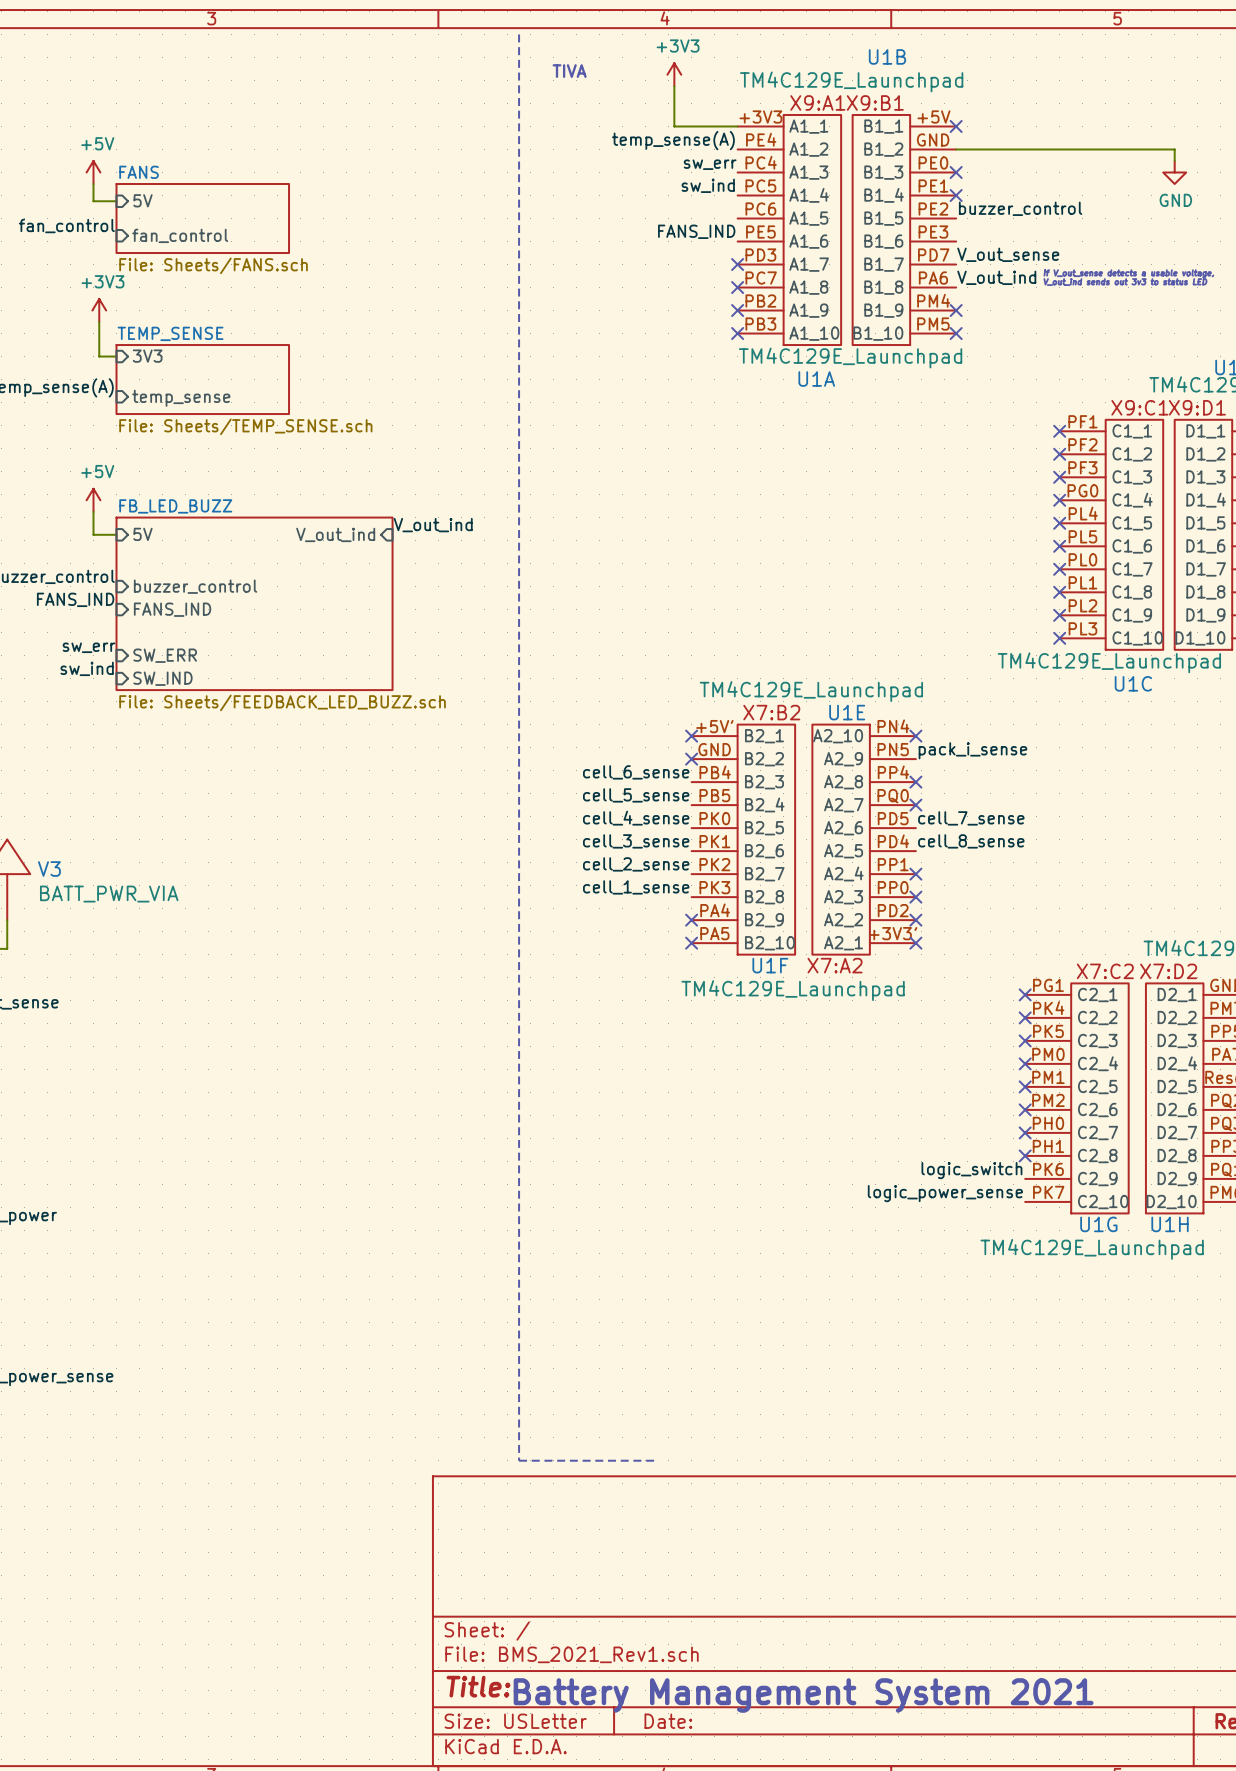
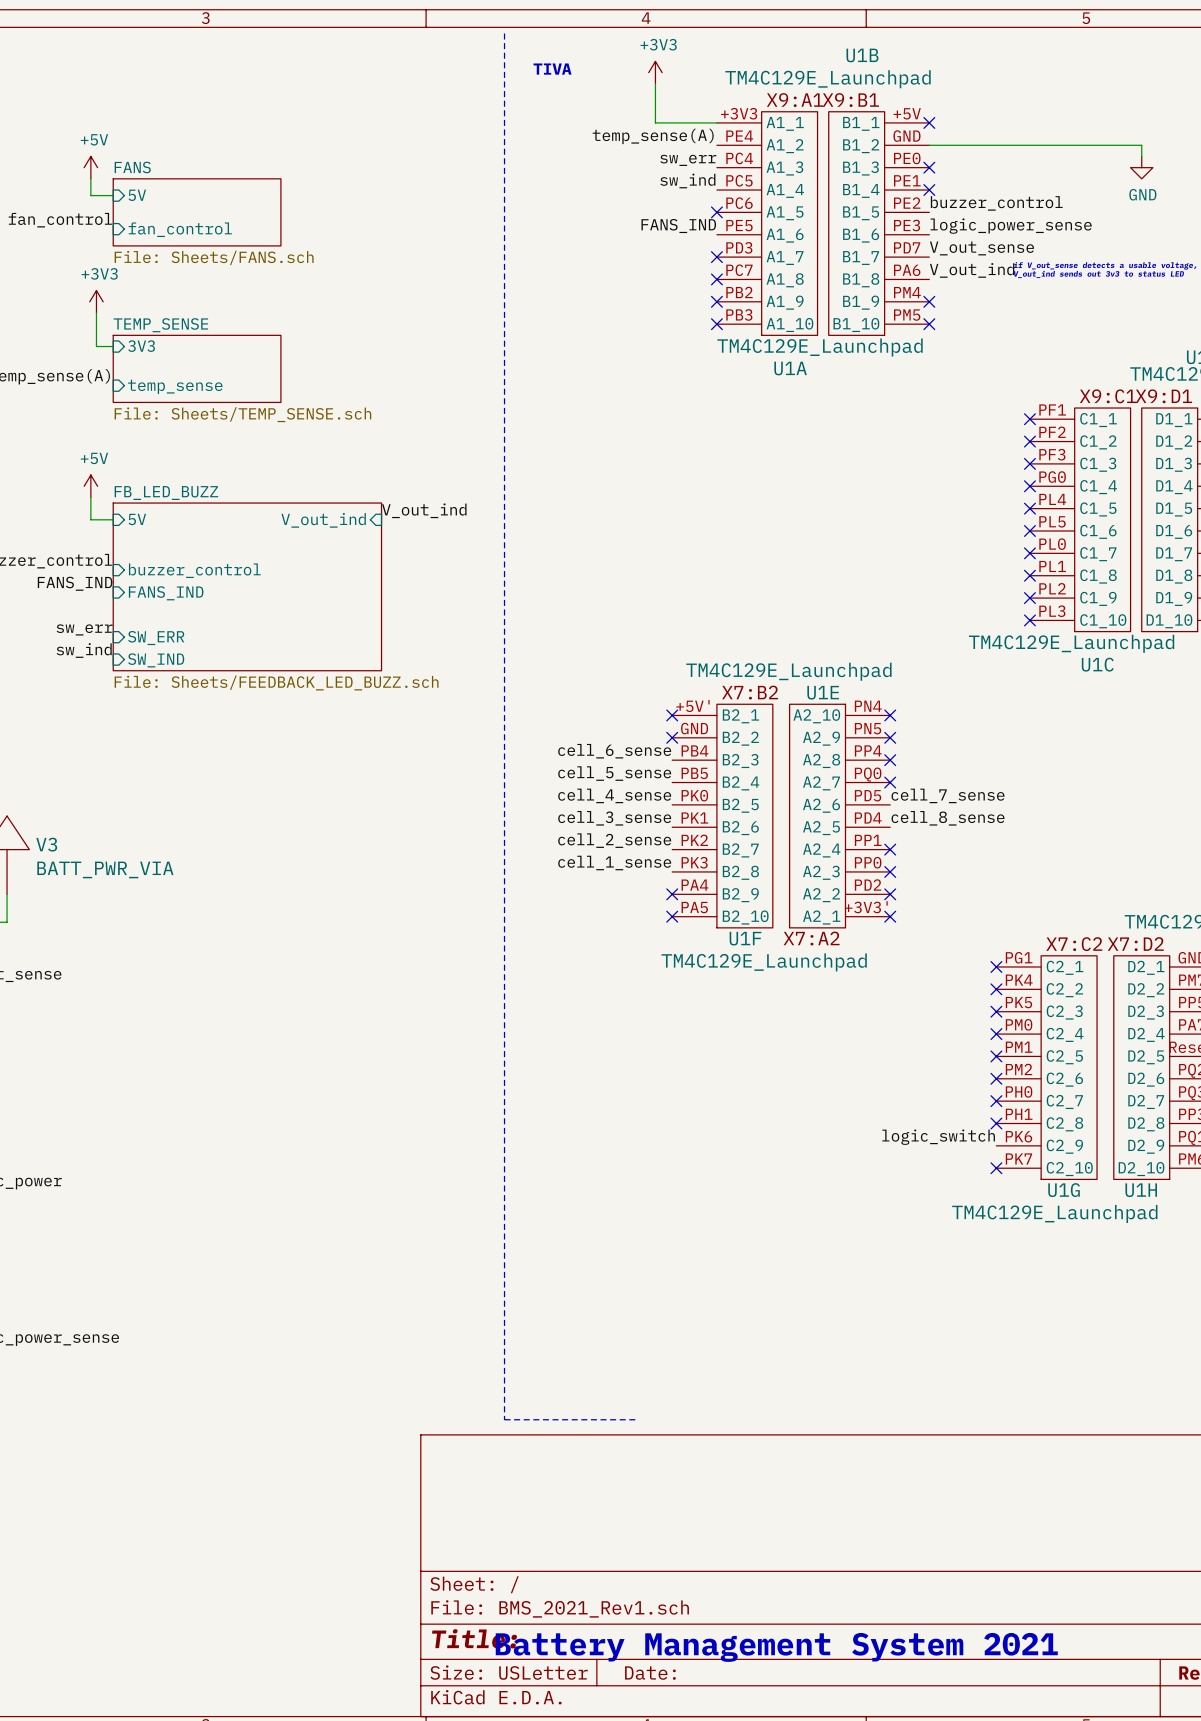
no-connect mark: none -> (716, 212)
label: none -> logic_power_sense (1011, 226)
label: pack_i_sense (972, 750) -> none
no-connect mark: none -> (890, 737)
label: logic_power_sense (945, 1193) -> none
no-connect mark: none -> (996, 1168)

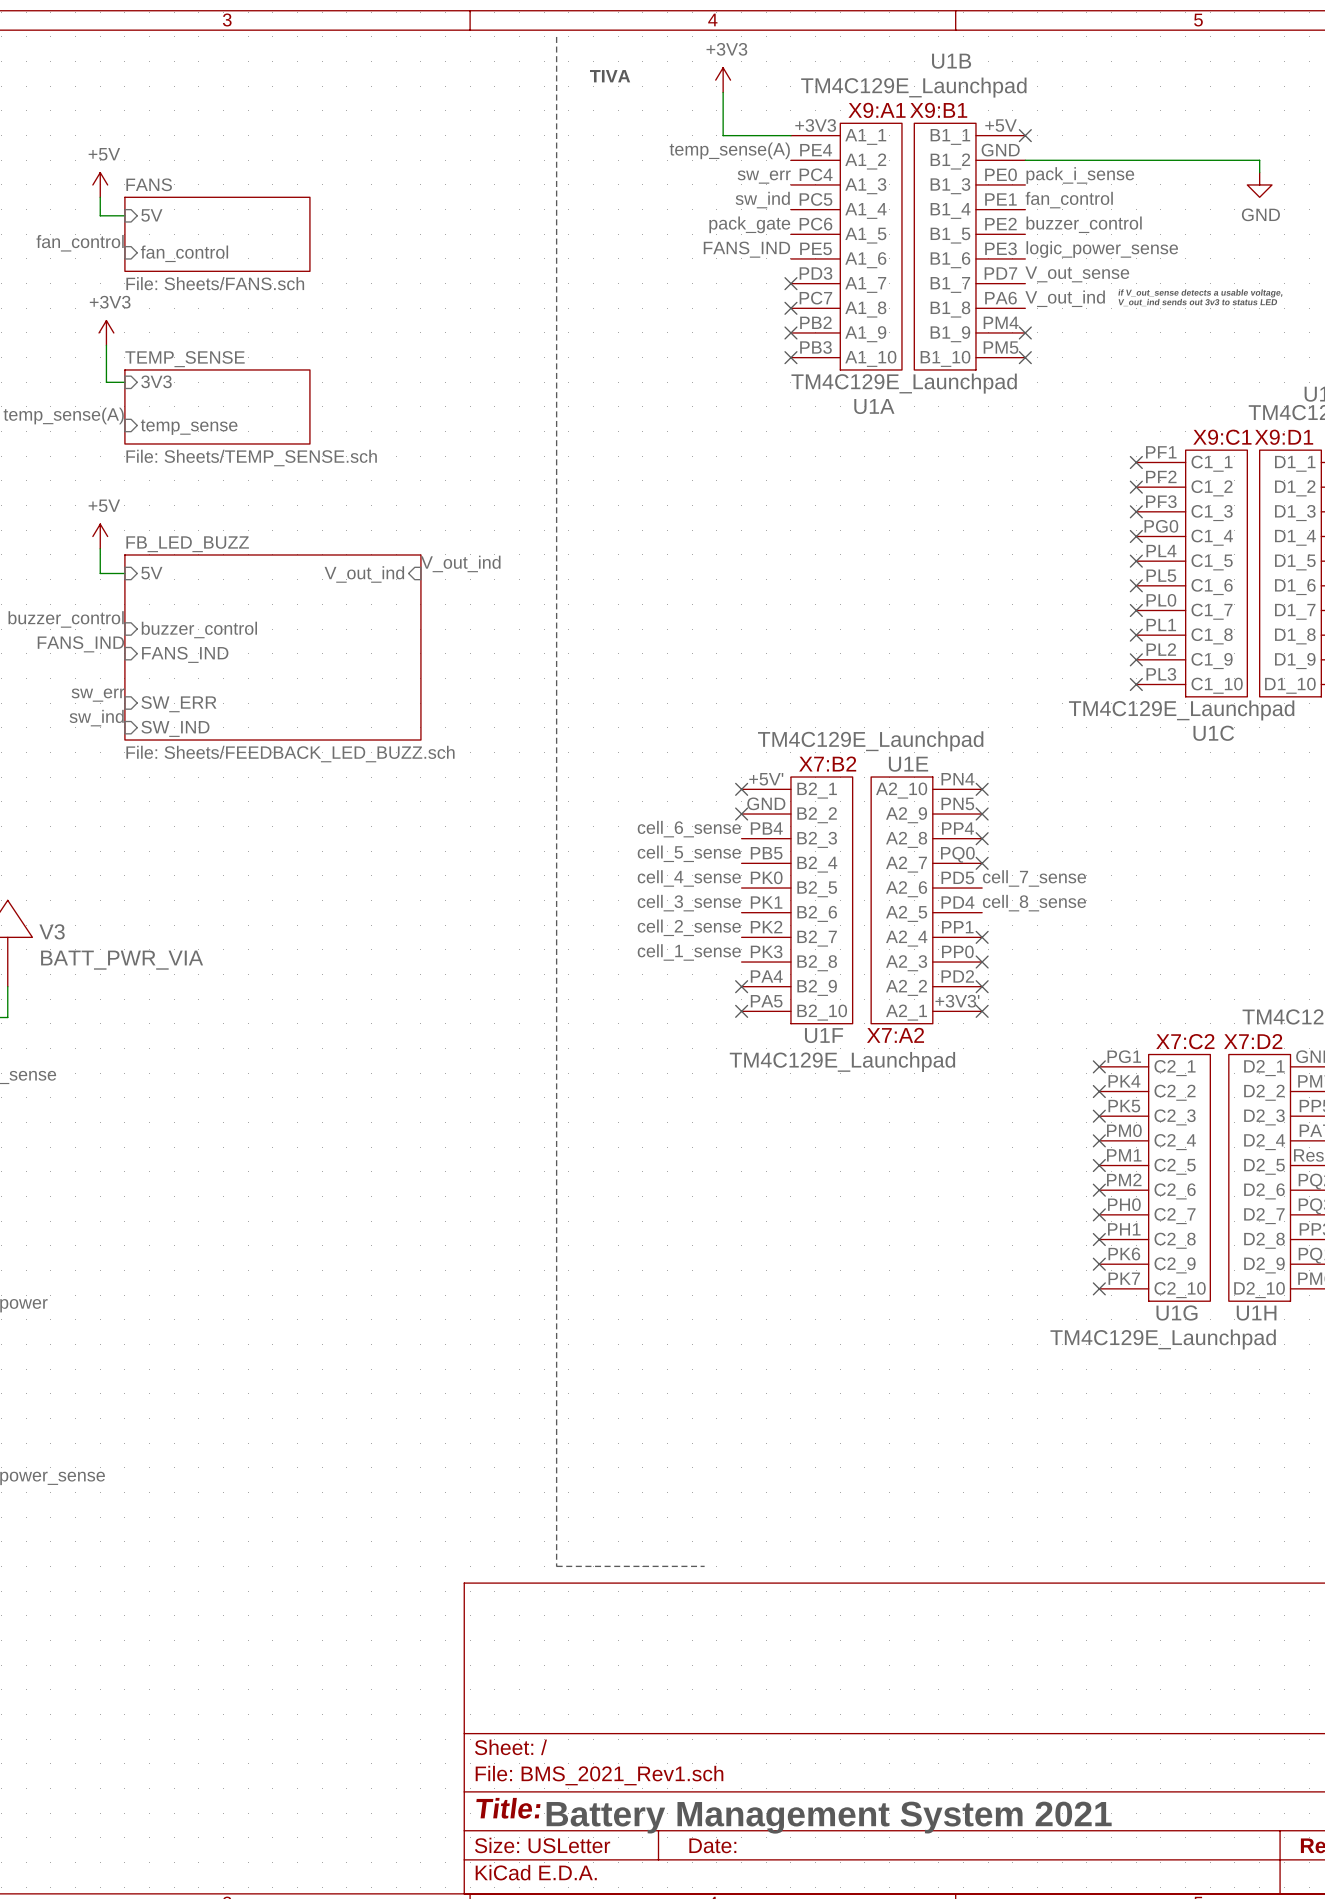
label: none -> pack_i_sense (1080, 175)
no-connect mark: (929, 167) -> none
label: none -> fan_control (1069, 200)
no-connect mark: (929, 190) -> none
label: none -> pack_gate (749, 224)
no-connect mark: (716, 212) -> none
label: logic_switch (938, 1137) -> none
no-connect mark: none -> (1099, 1264)

